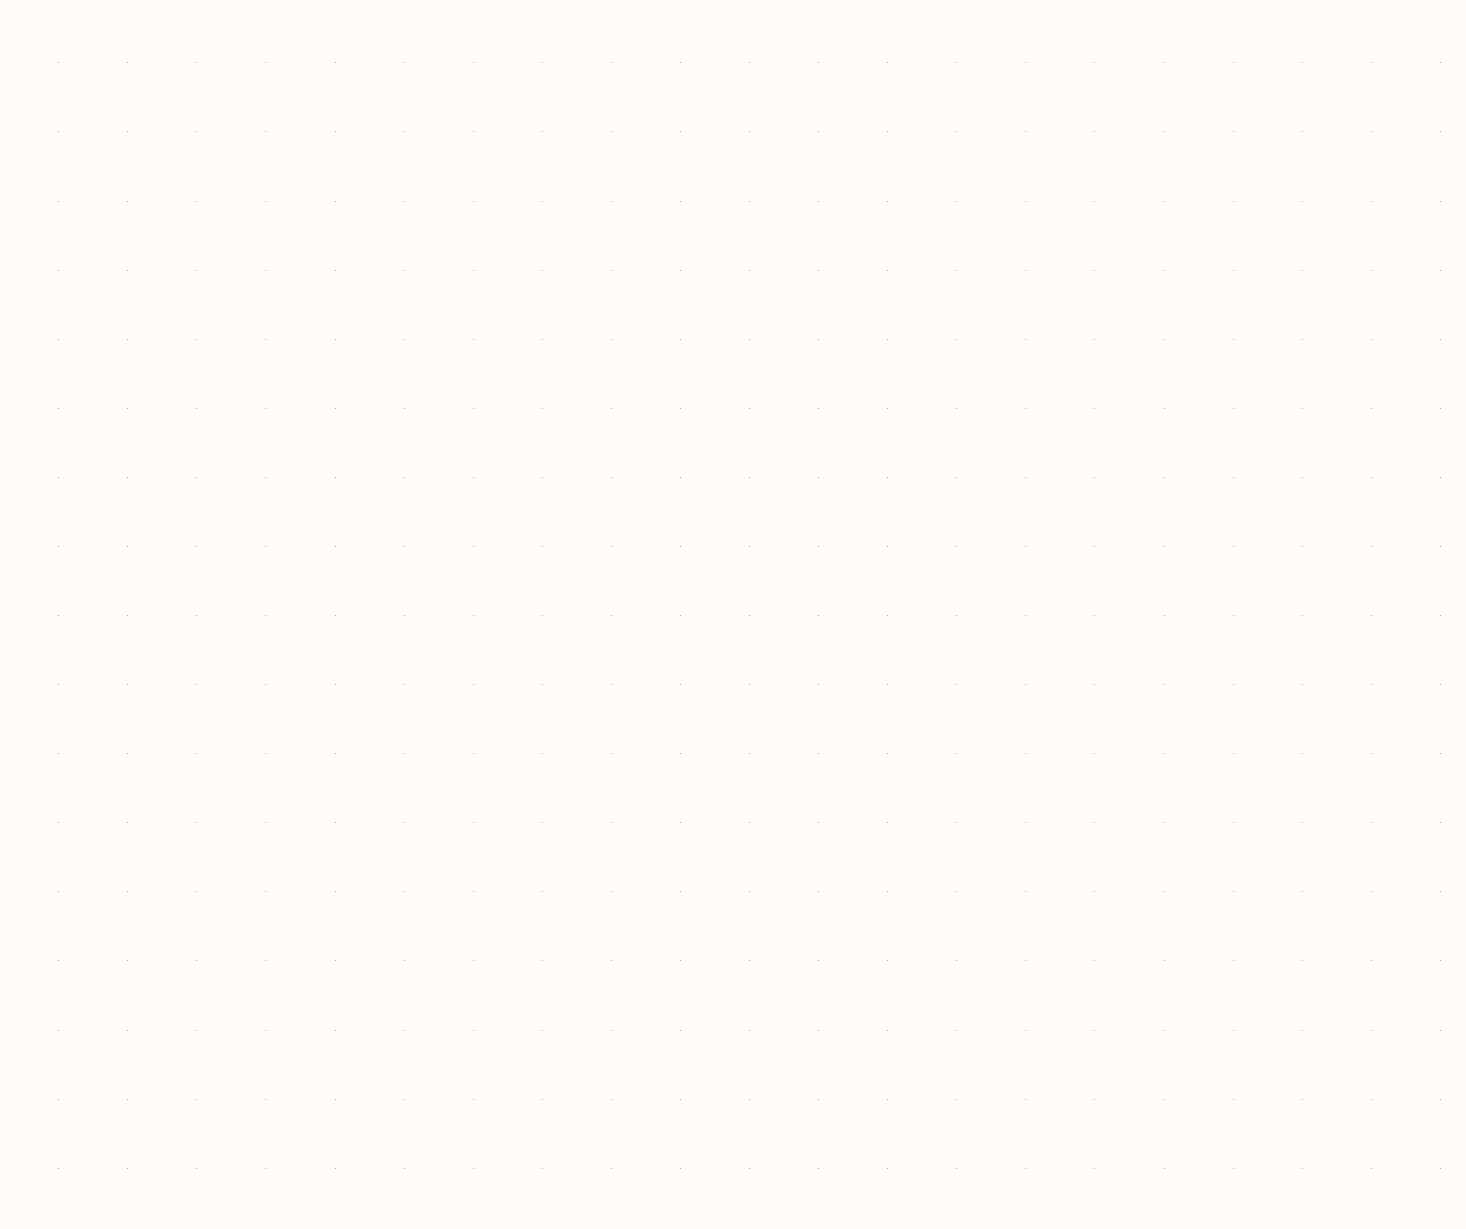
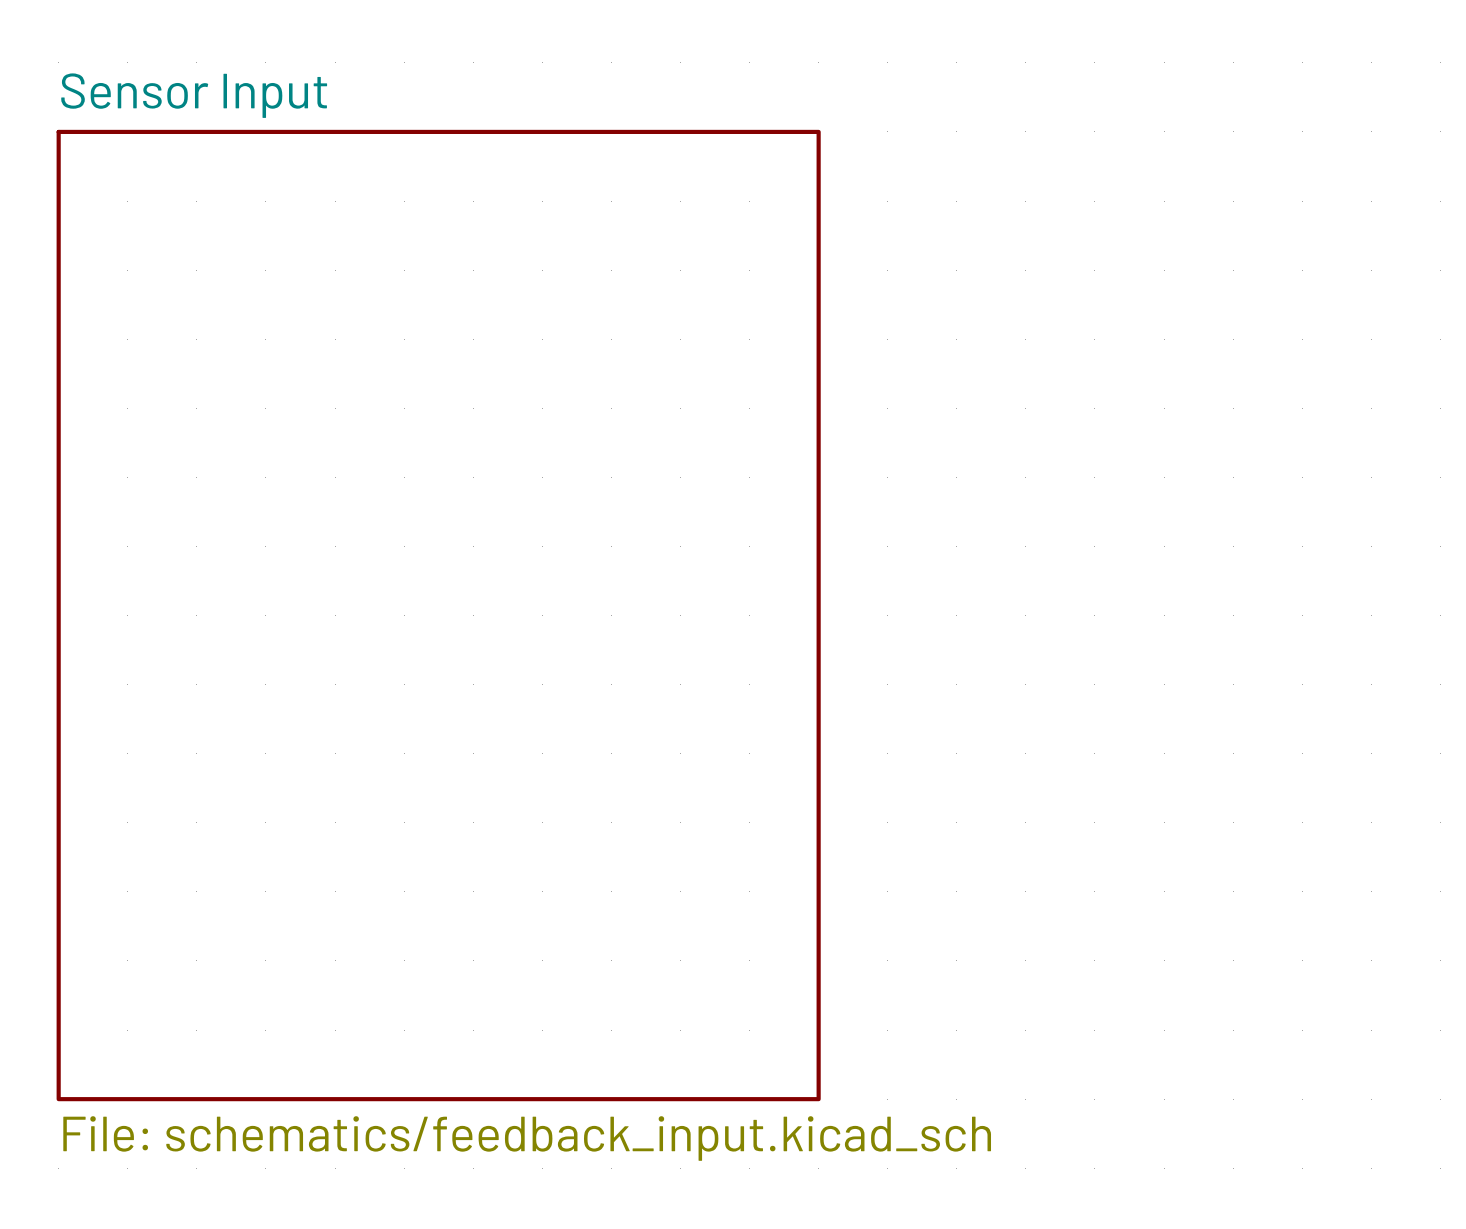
sheet Sensor Input: none -> File: schematics/feedback_input.kicad_sch (438, 615)

